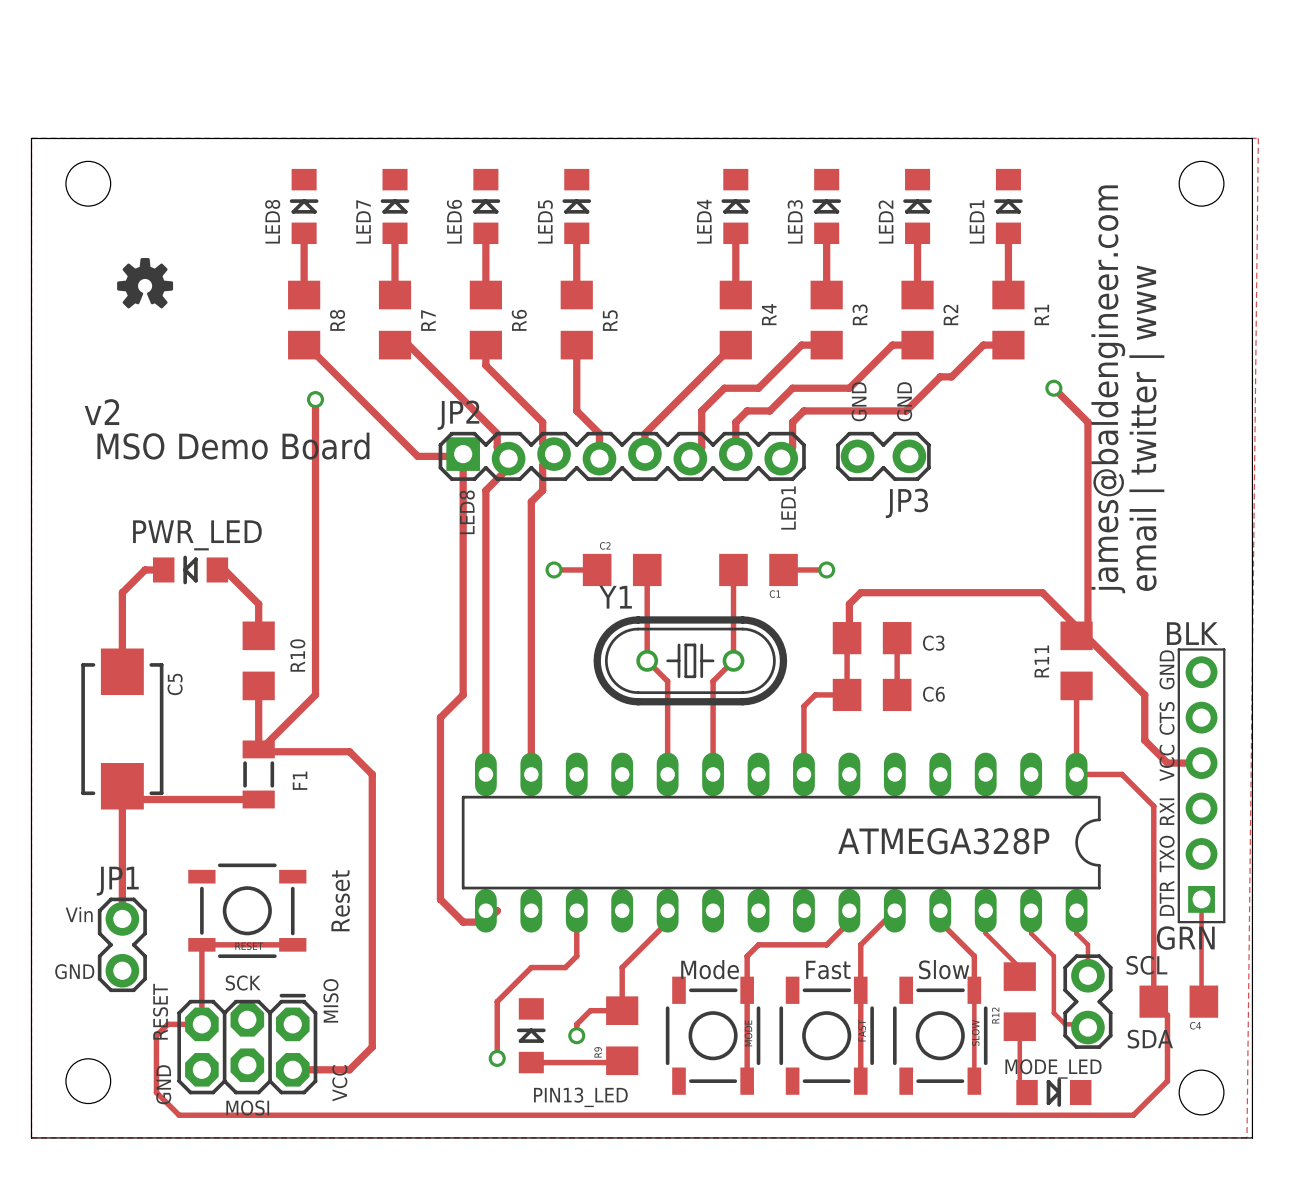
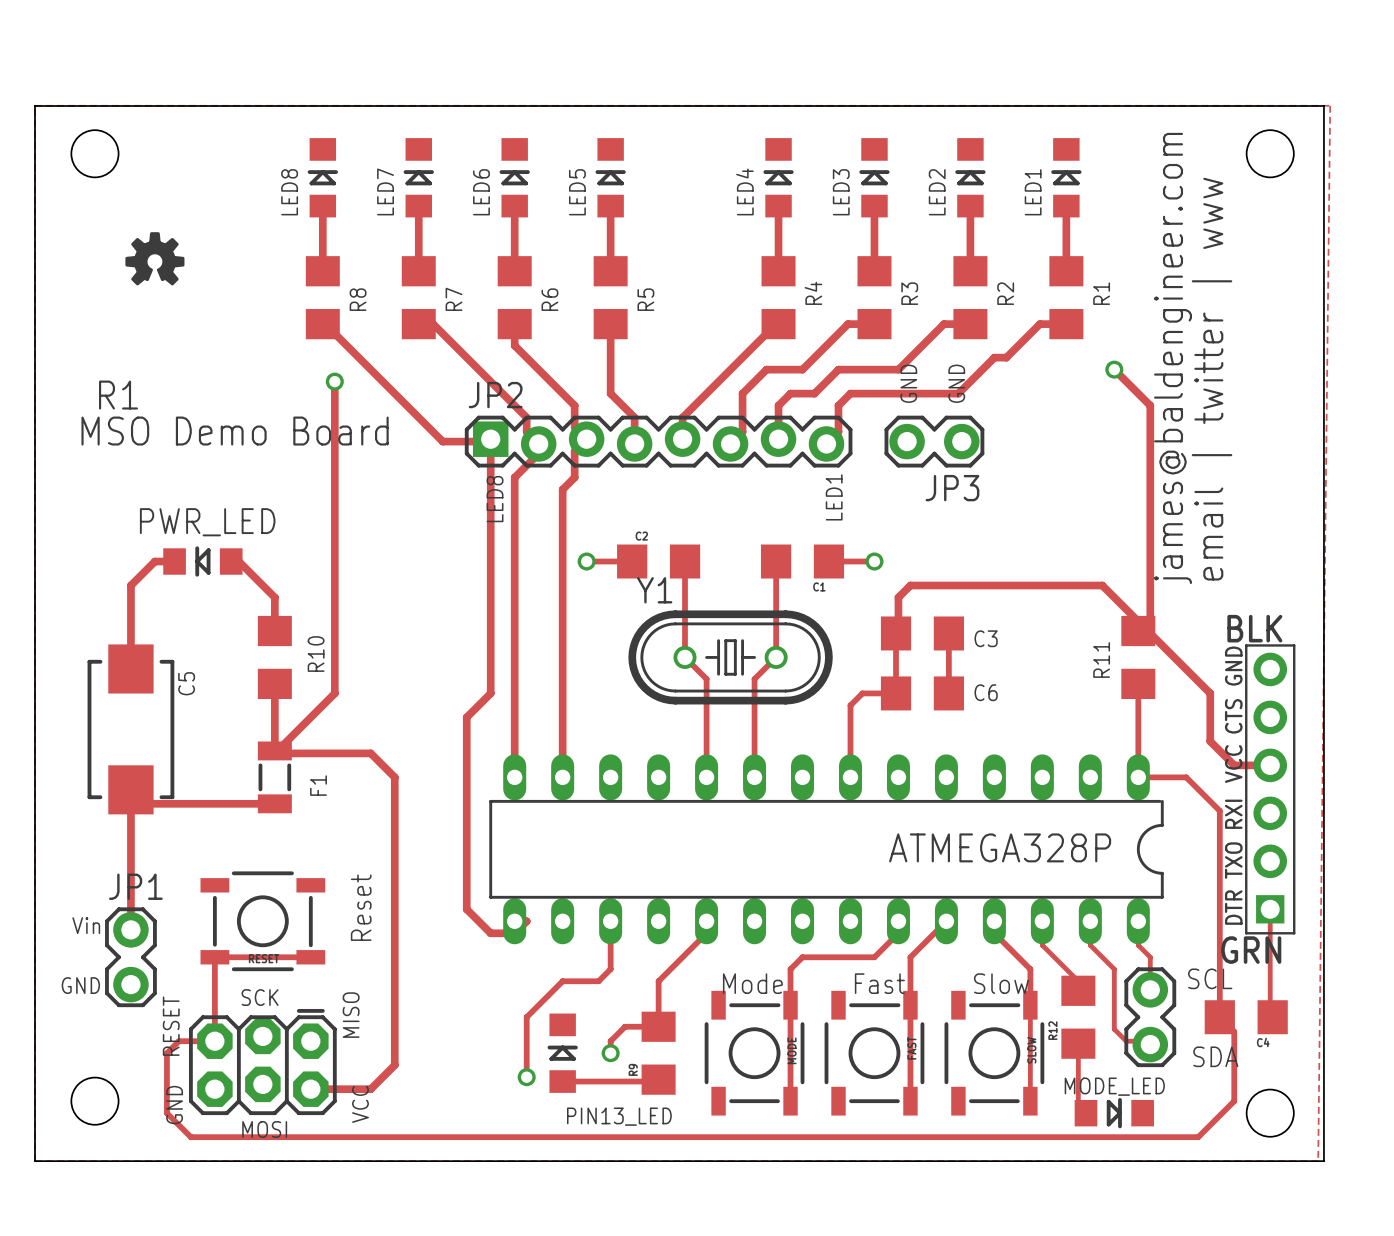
text: v2 (101, 412) -> R1 (118, 395)

